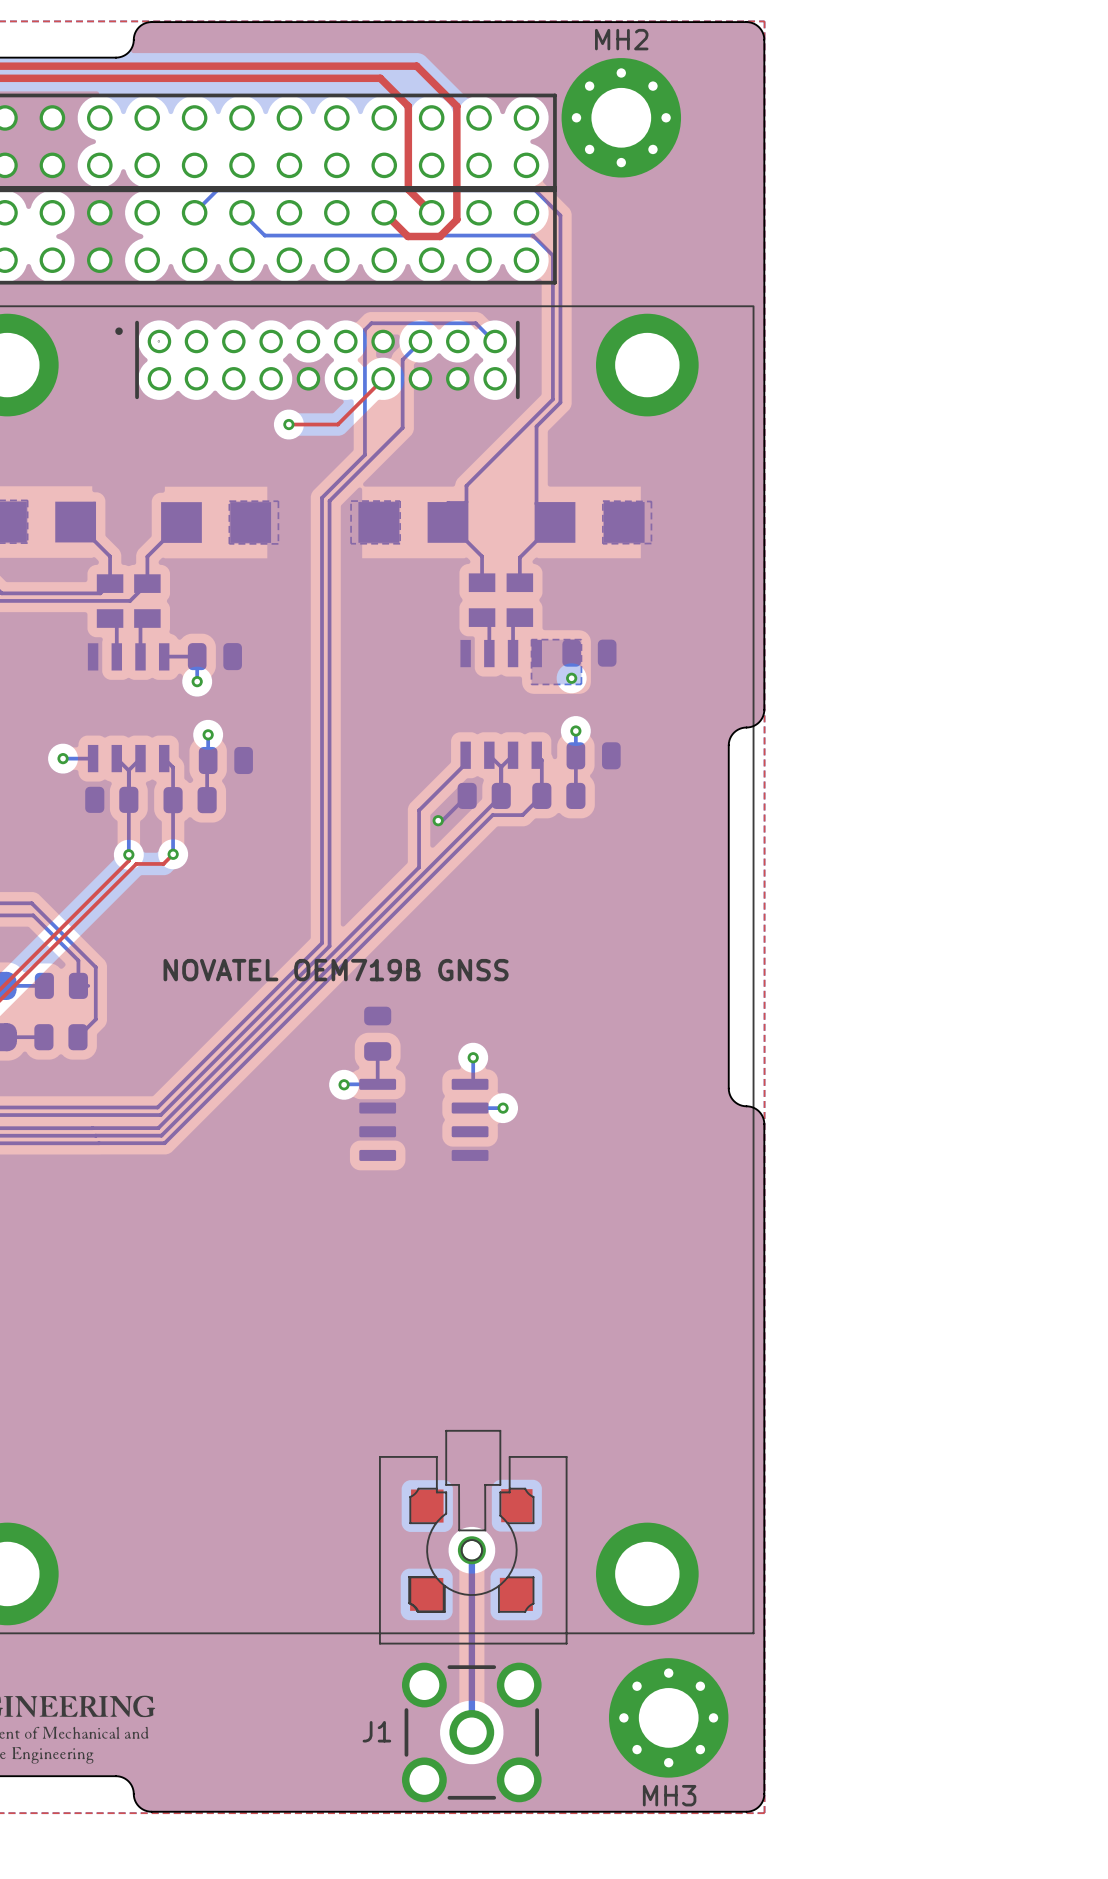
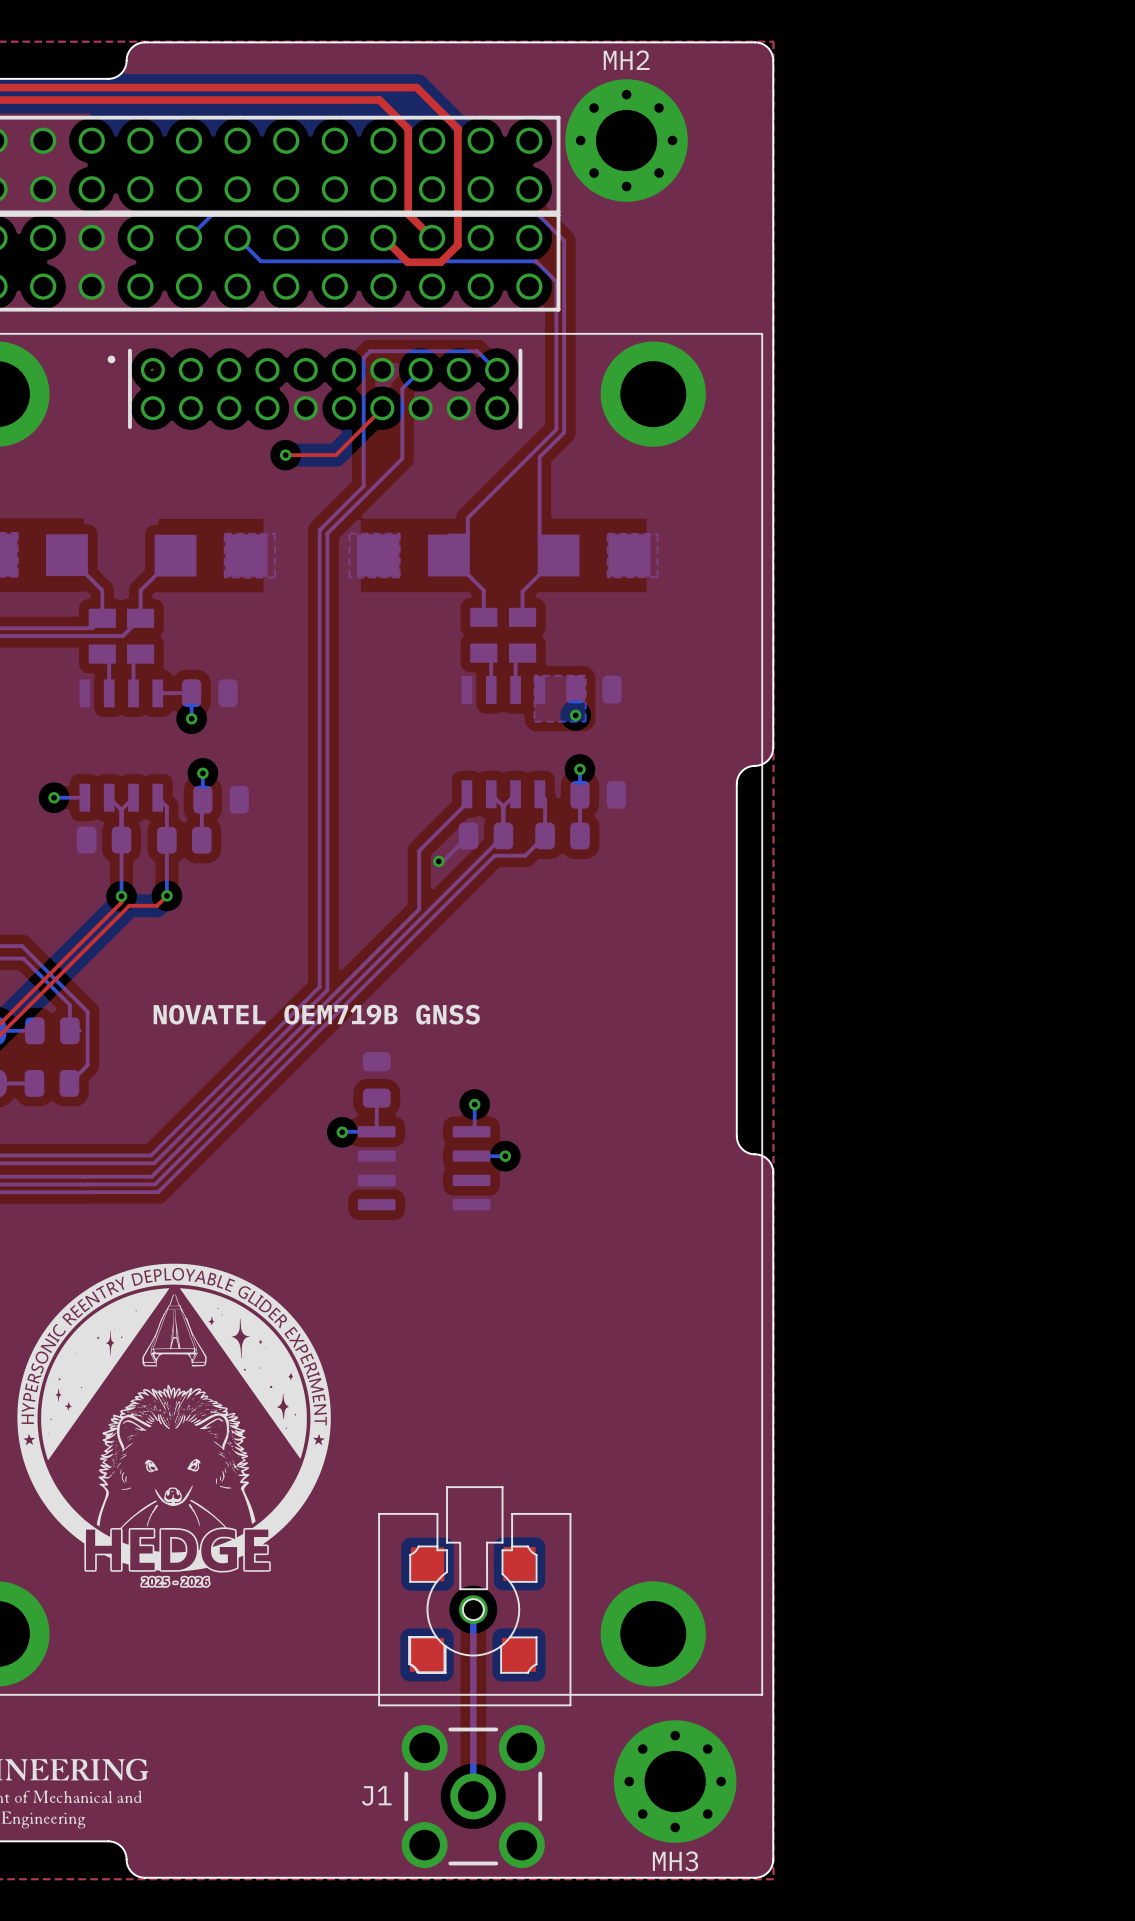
drawing: none -> [17, 1263, 331, 1588]

